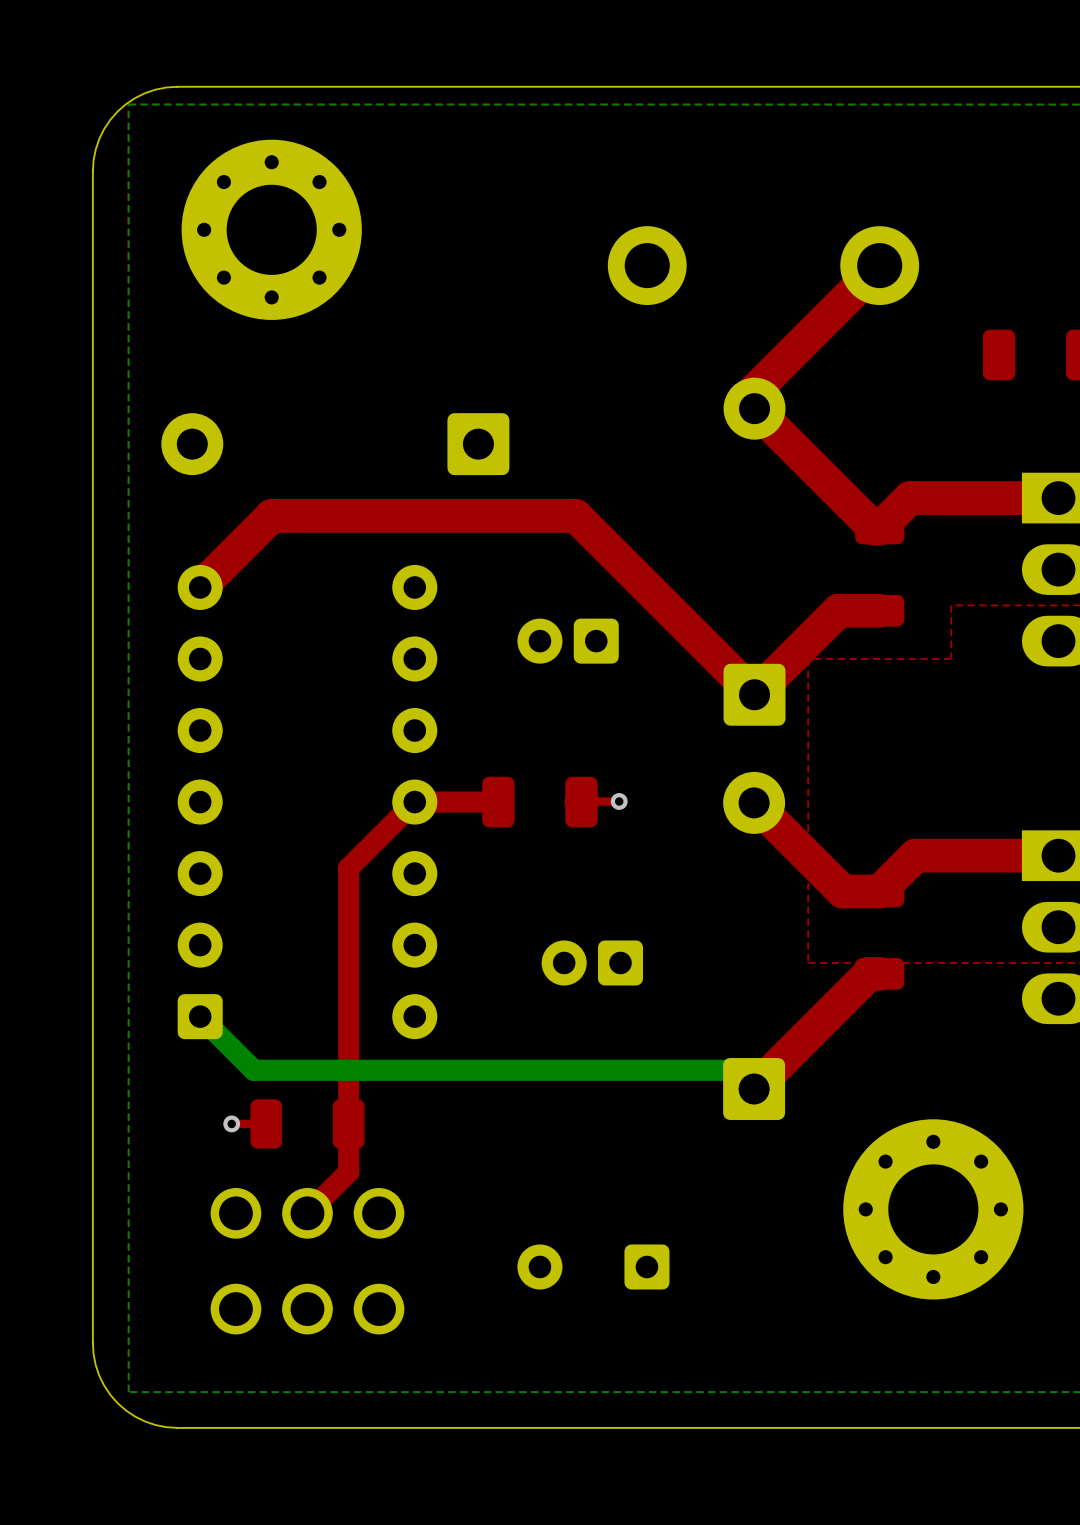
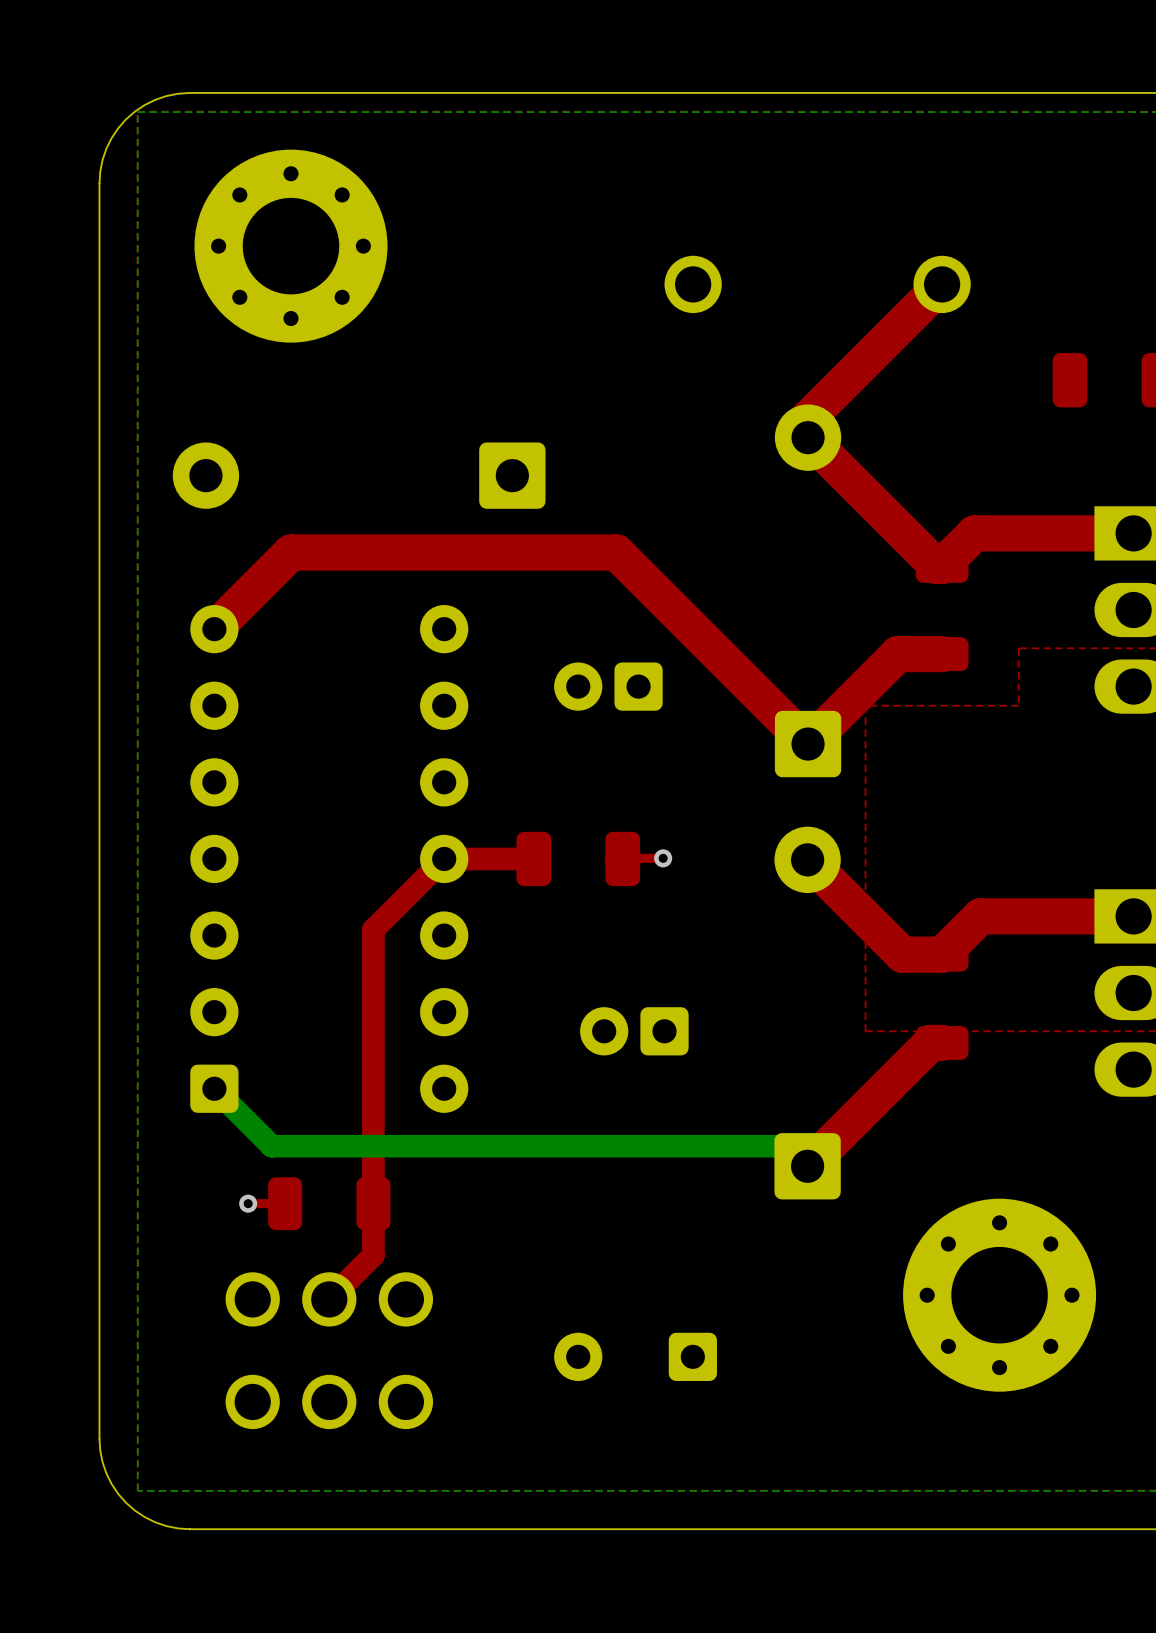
part footprint: [607, 226, 687, 306] -> [664, 255, 722, 314]
part footprint: [840, 226, 920, 306] -> [913, 255, 971, 314]

